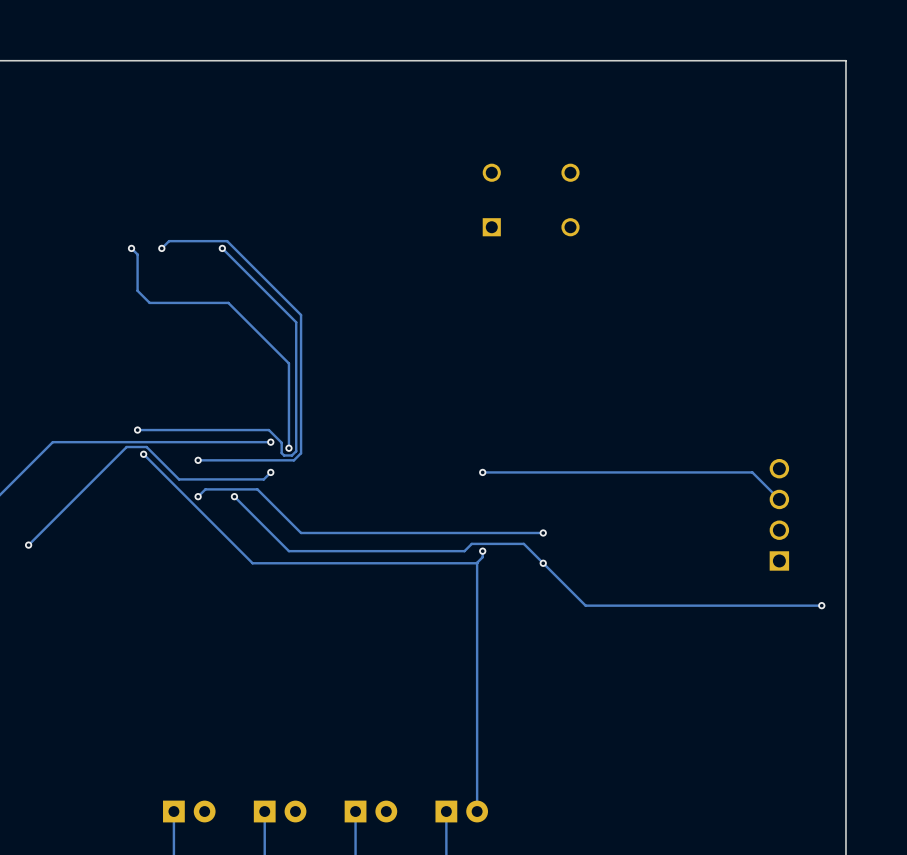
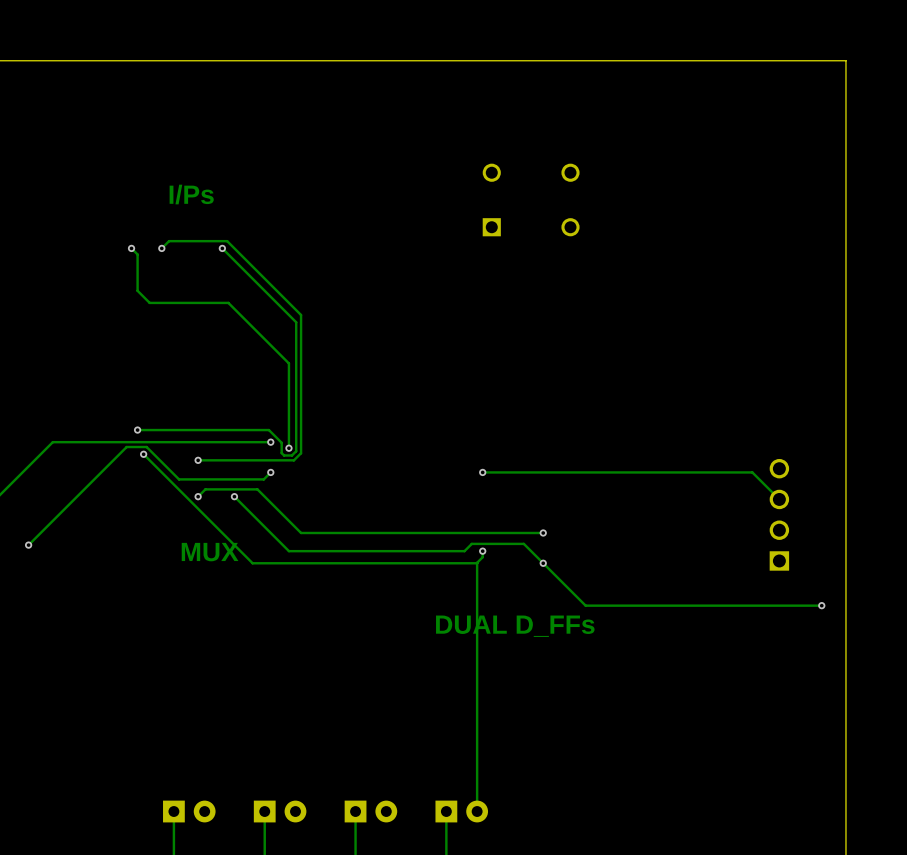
text: none -> I/Ps (191, 194)
text: none -> MUX (210, 552)
text: none -> DUAL D_FFs (515, 626)

